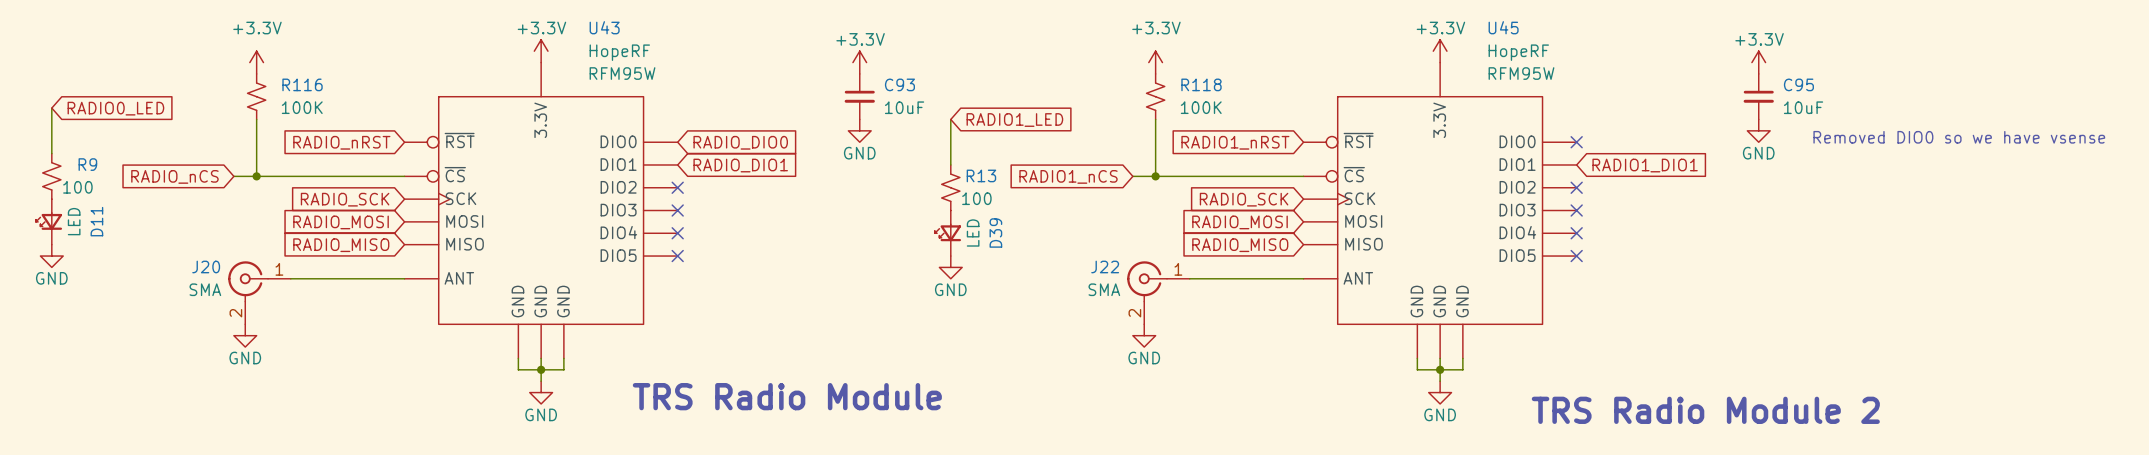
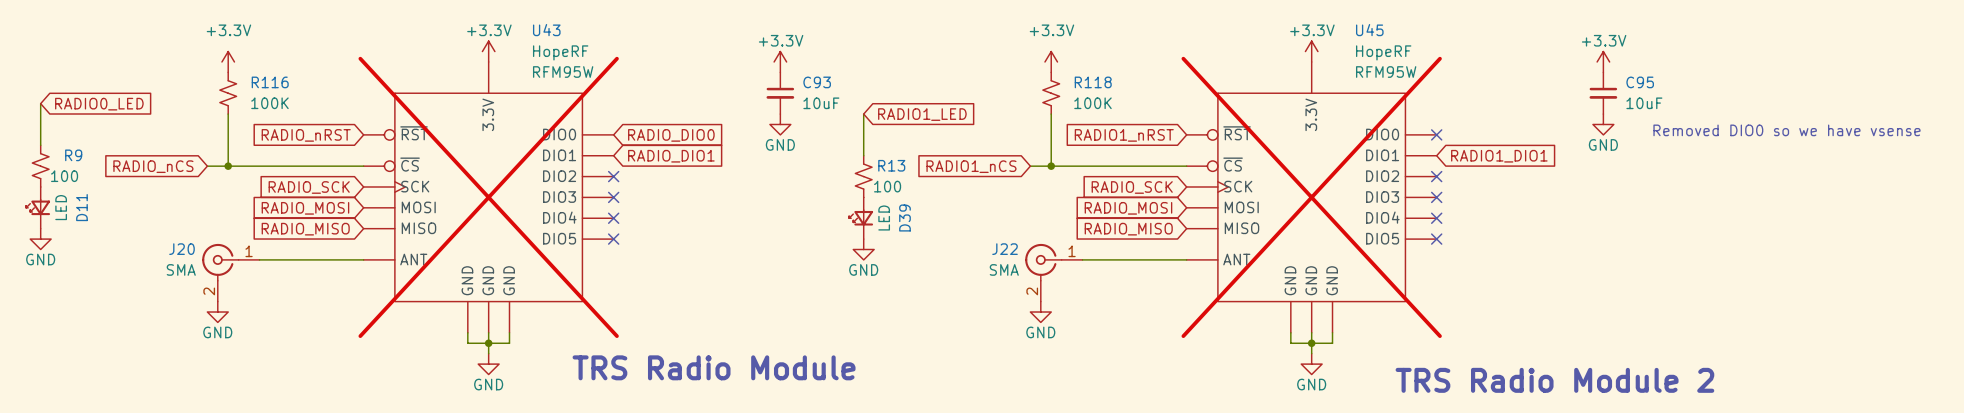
U43 do-not-place cross: none -> (488, 197)
U45 do-not-place cross: none -> (1311, 197)

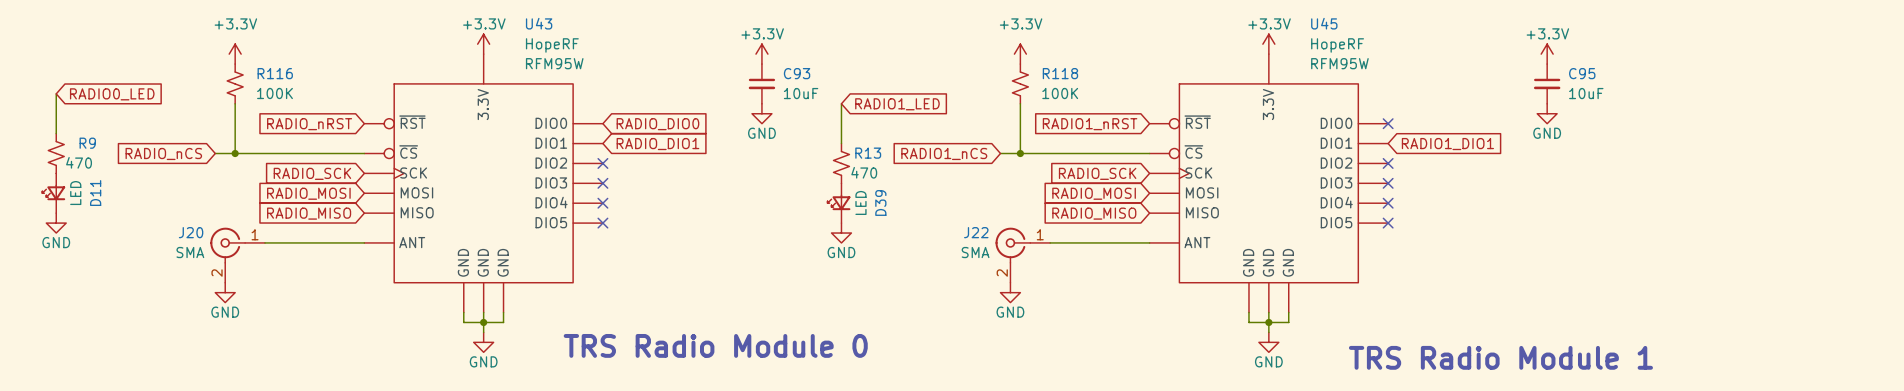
text: Removed DIO0 so we have vsense (1786, 130) -> none
R9 value: 100 (64, 176) -> 470 (79, 162)
R13 value: 100 (887, 186) -> 470 (864, 172)
U43 do-not-place cross: (488, 197) -> none
U45 do-not-place cross: (1311, 197) -> none
text: TRS Radio Module (714, 367) -> TRS Radio Module 0 (715, 345)
text: TRS Radio Module 2 (1554, 380) -> TRS Radio Module 1 (1500, 357)

